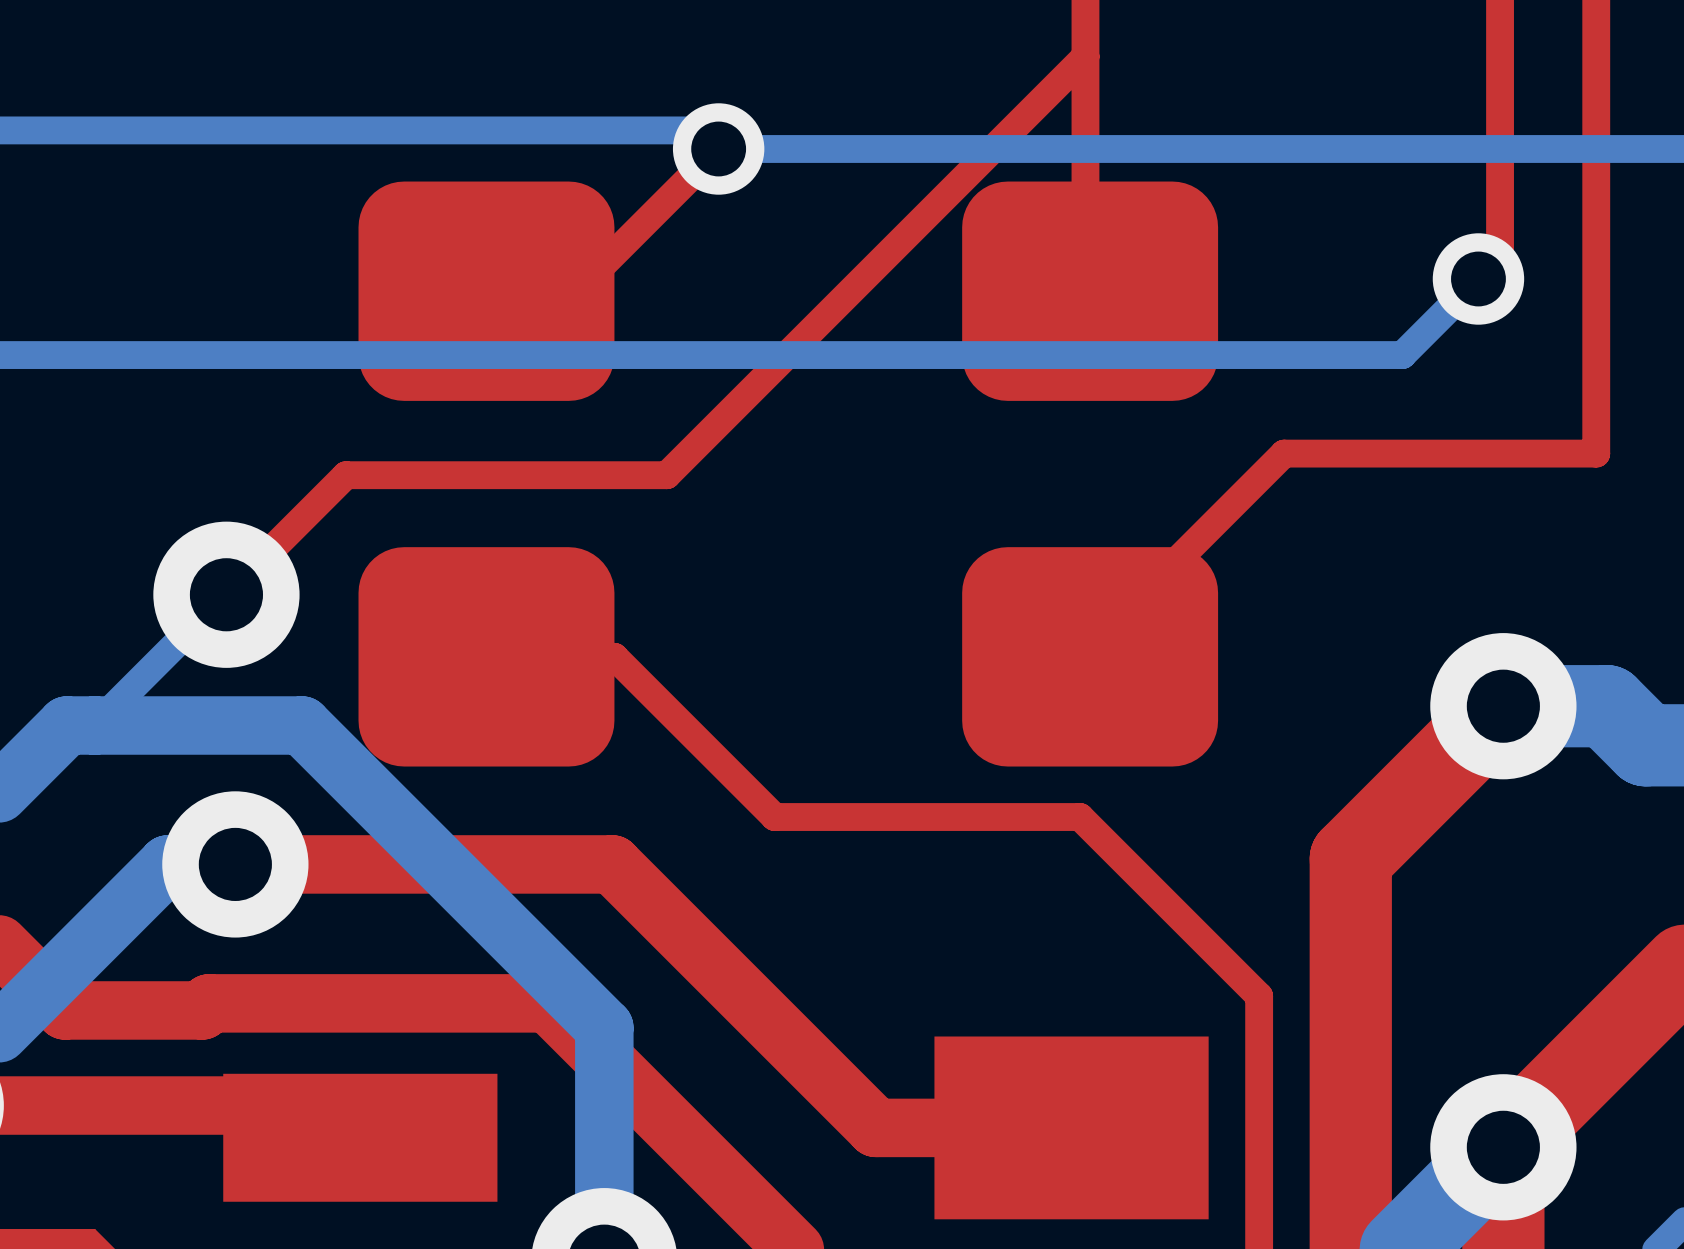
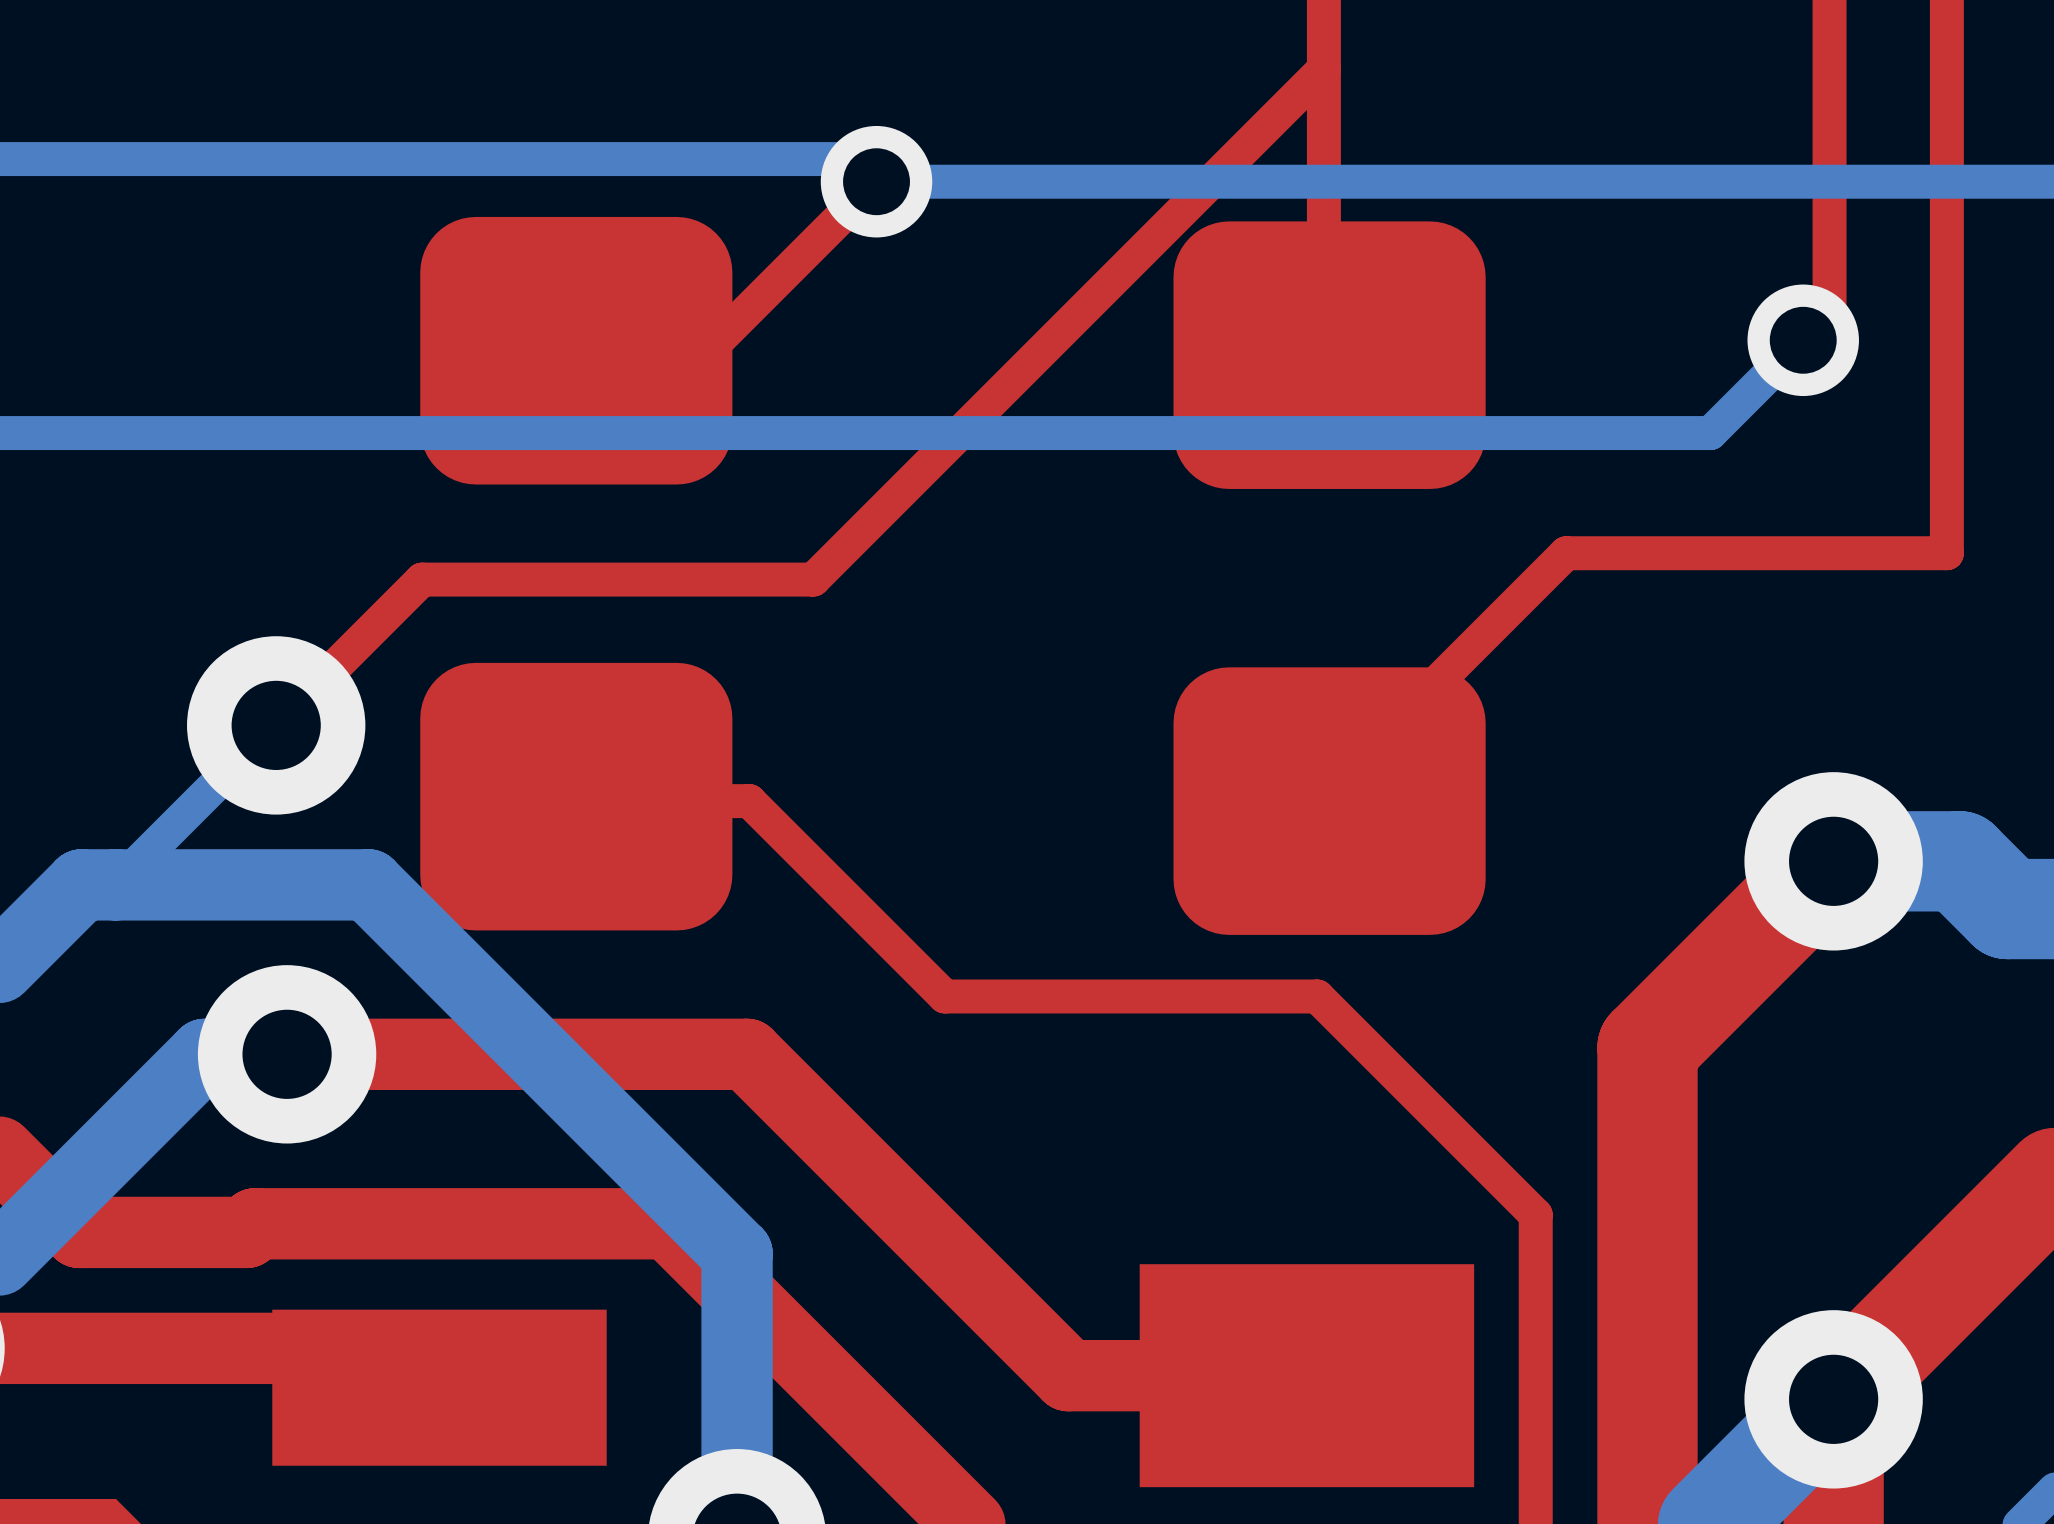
part position: (486, 474) -> (576, 573)

